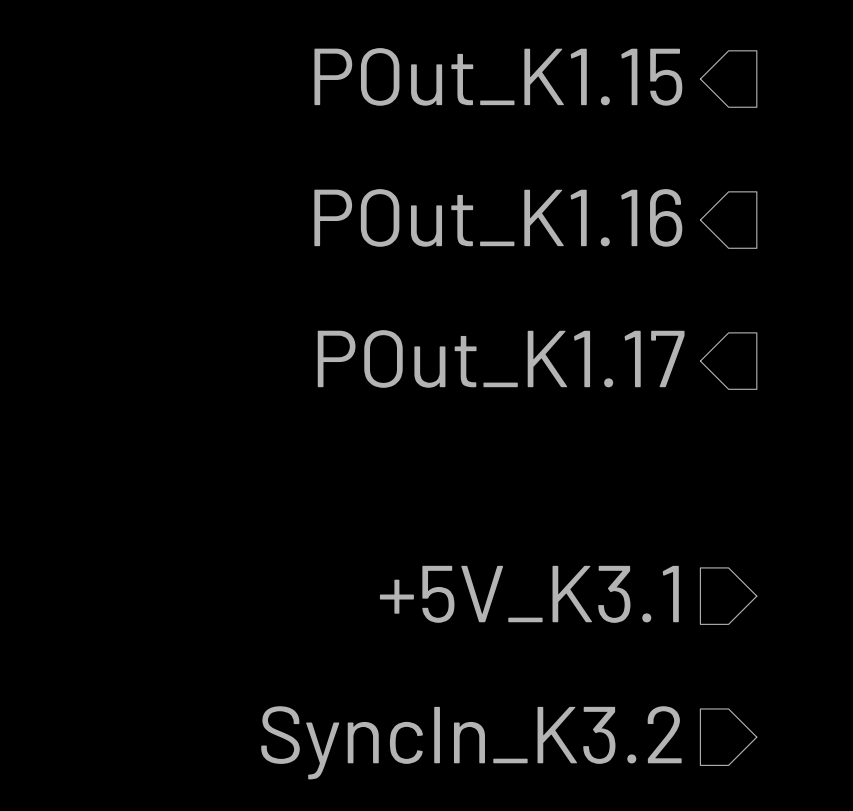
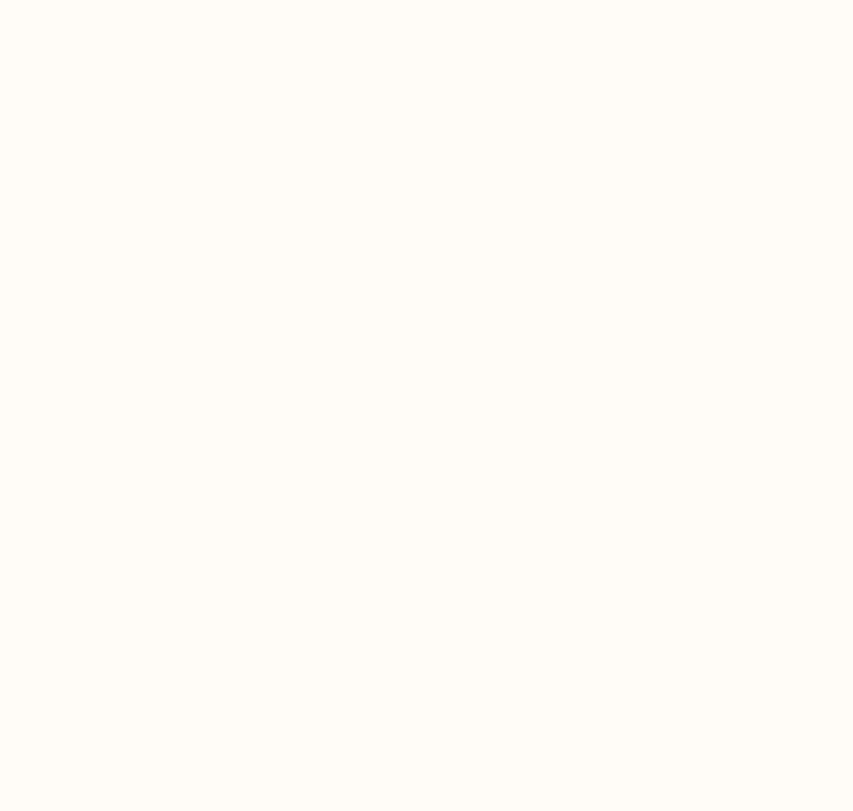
hierarchical label: POut_K1.15 (498, 76) -> none
hierarchical label: POut_K1.16 (498, 217) -> none
hierarchical label: POut_K1.17 (501, 358) -> none
hierarchical label: +5V_K3.1 (529, 594) -> none
hierarchical label: SyncIn_K3.2 (471, 742) -> none

